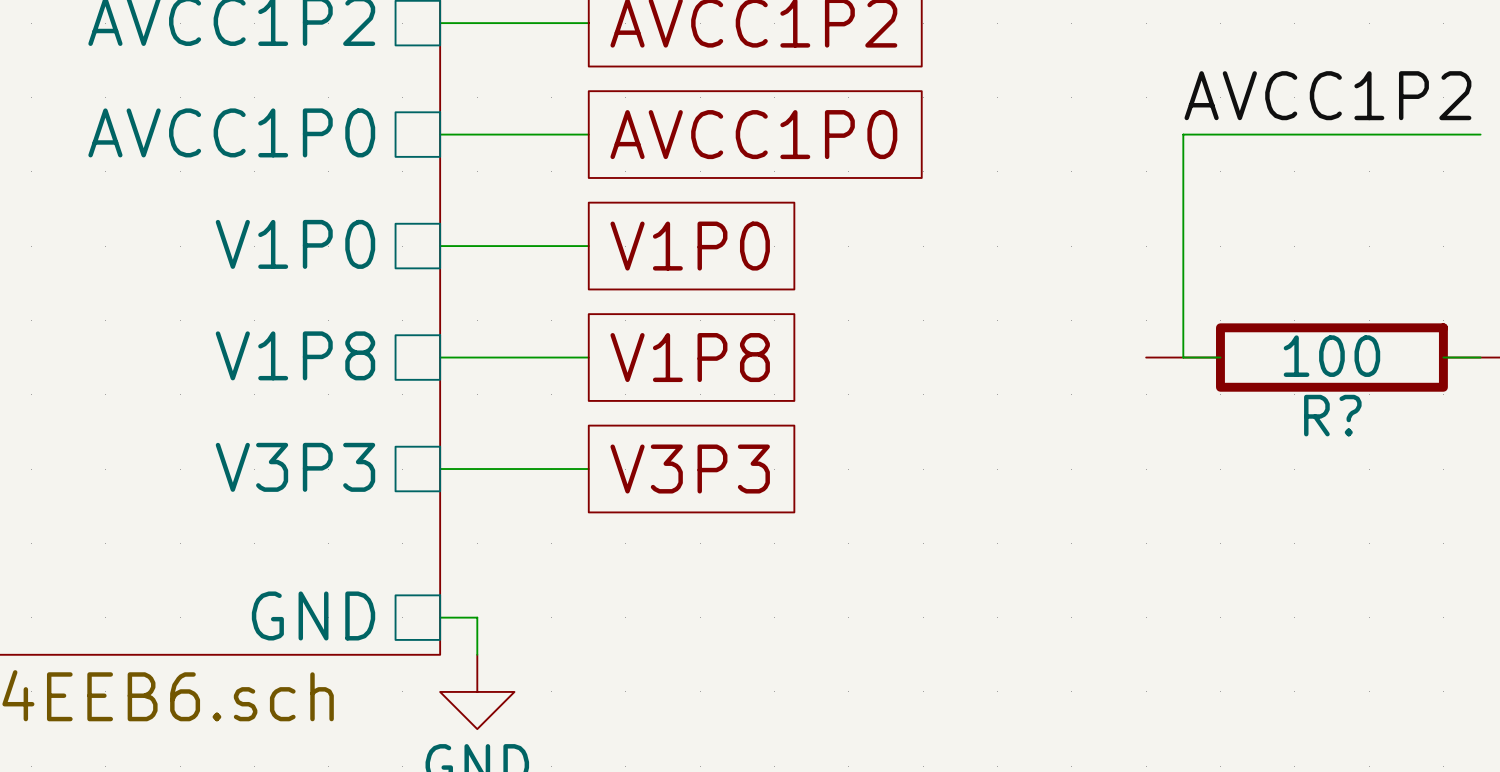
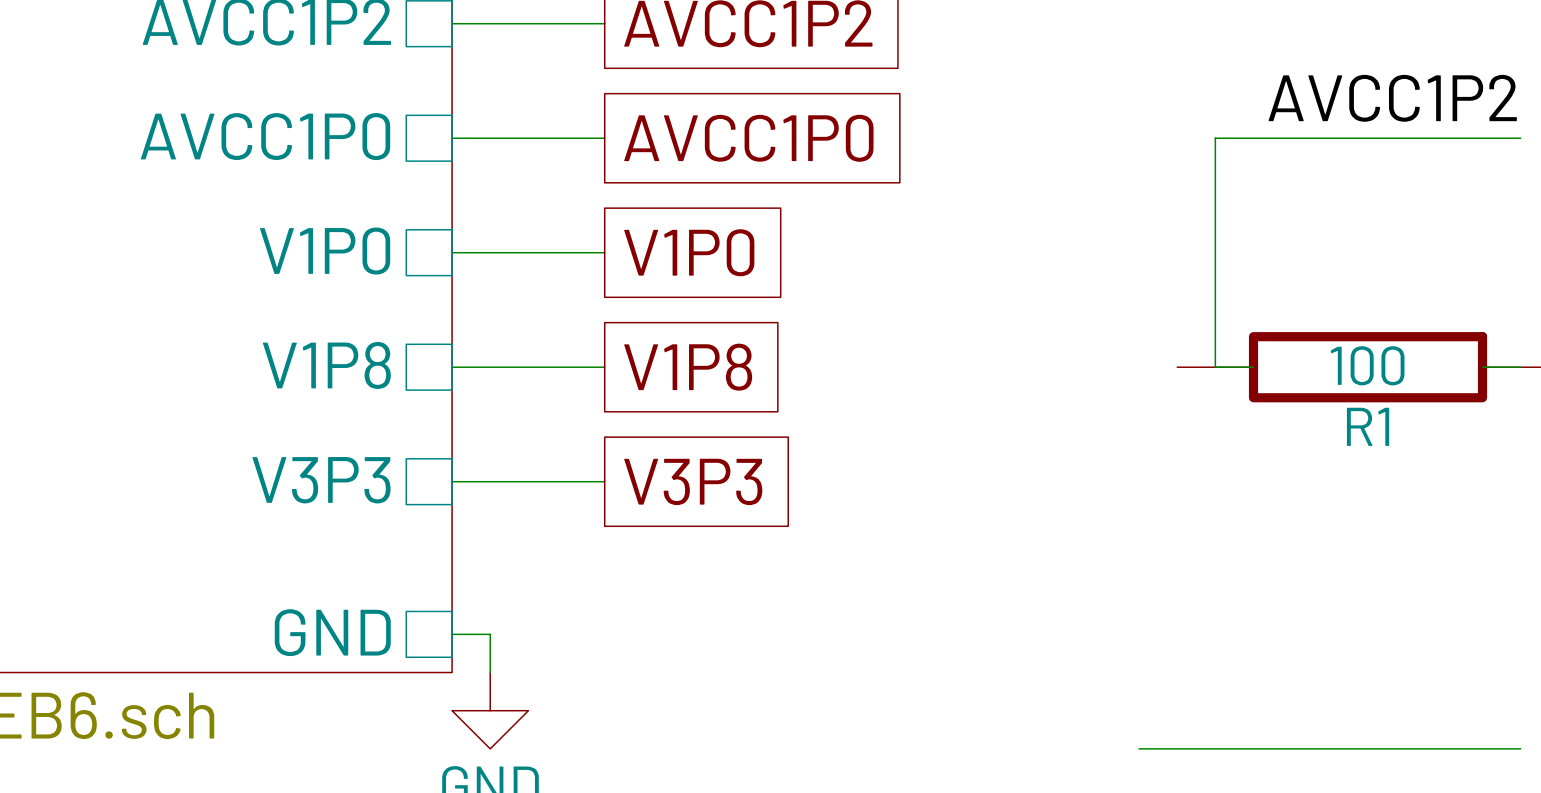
R? name: R? (1332, 415) -> R1 (1368, 426)
wire: none -> (1139, 748) (1520, 748)

